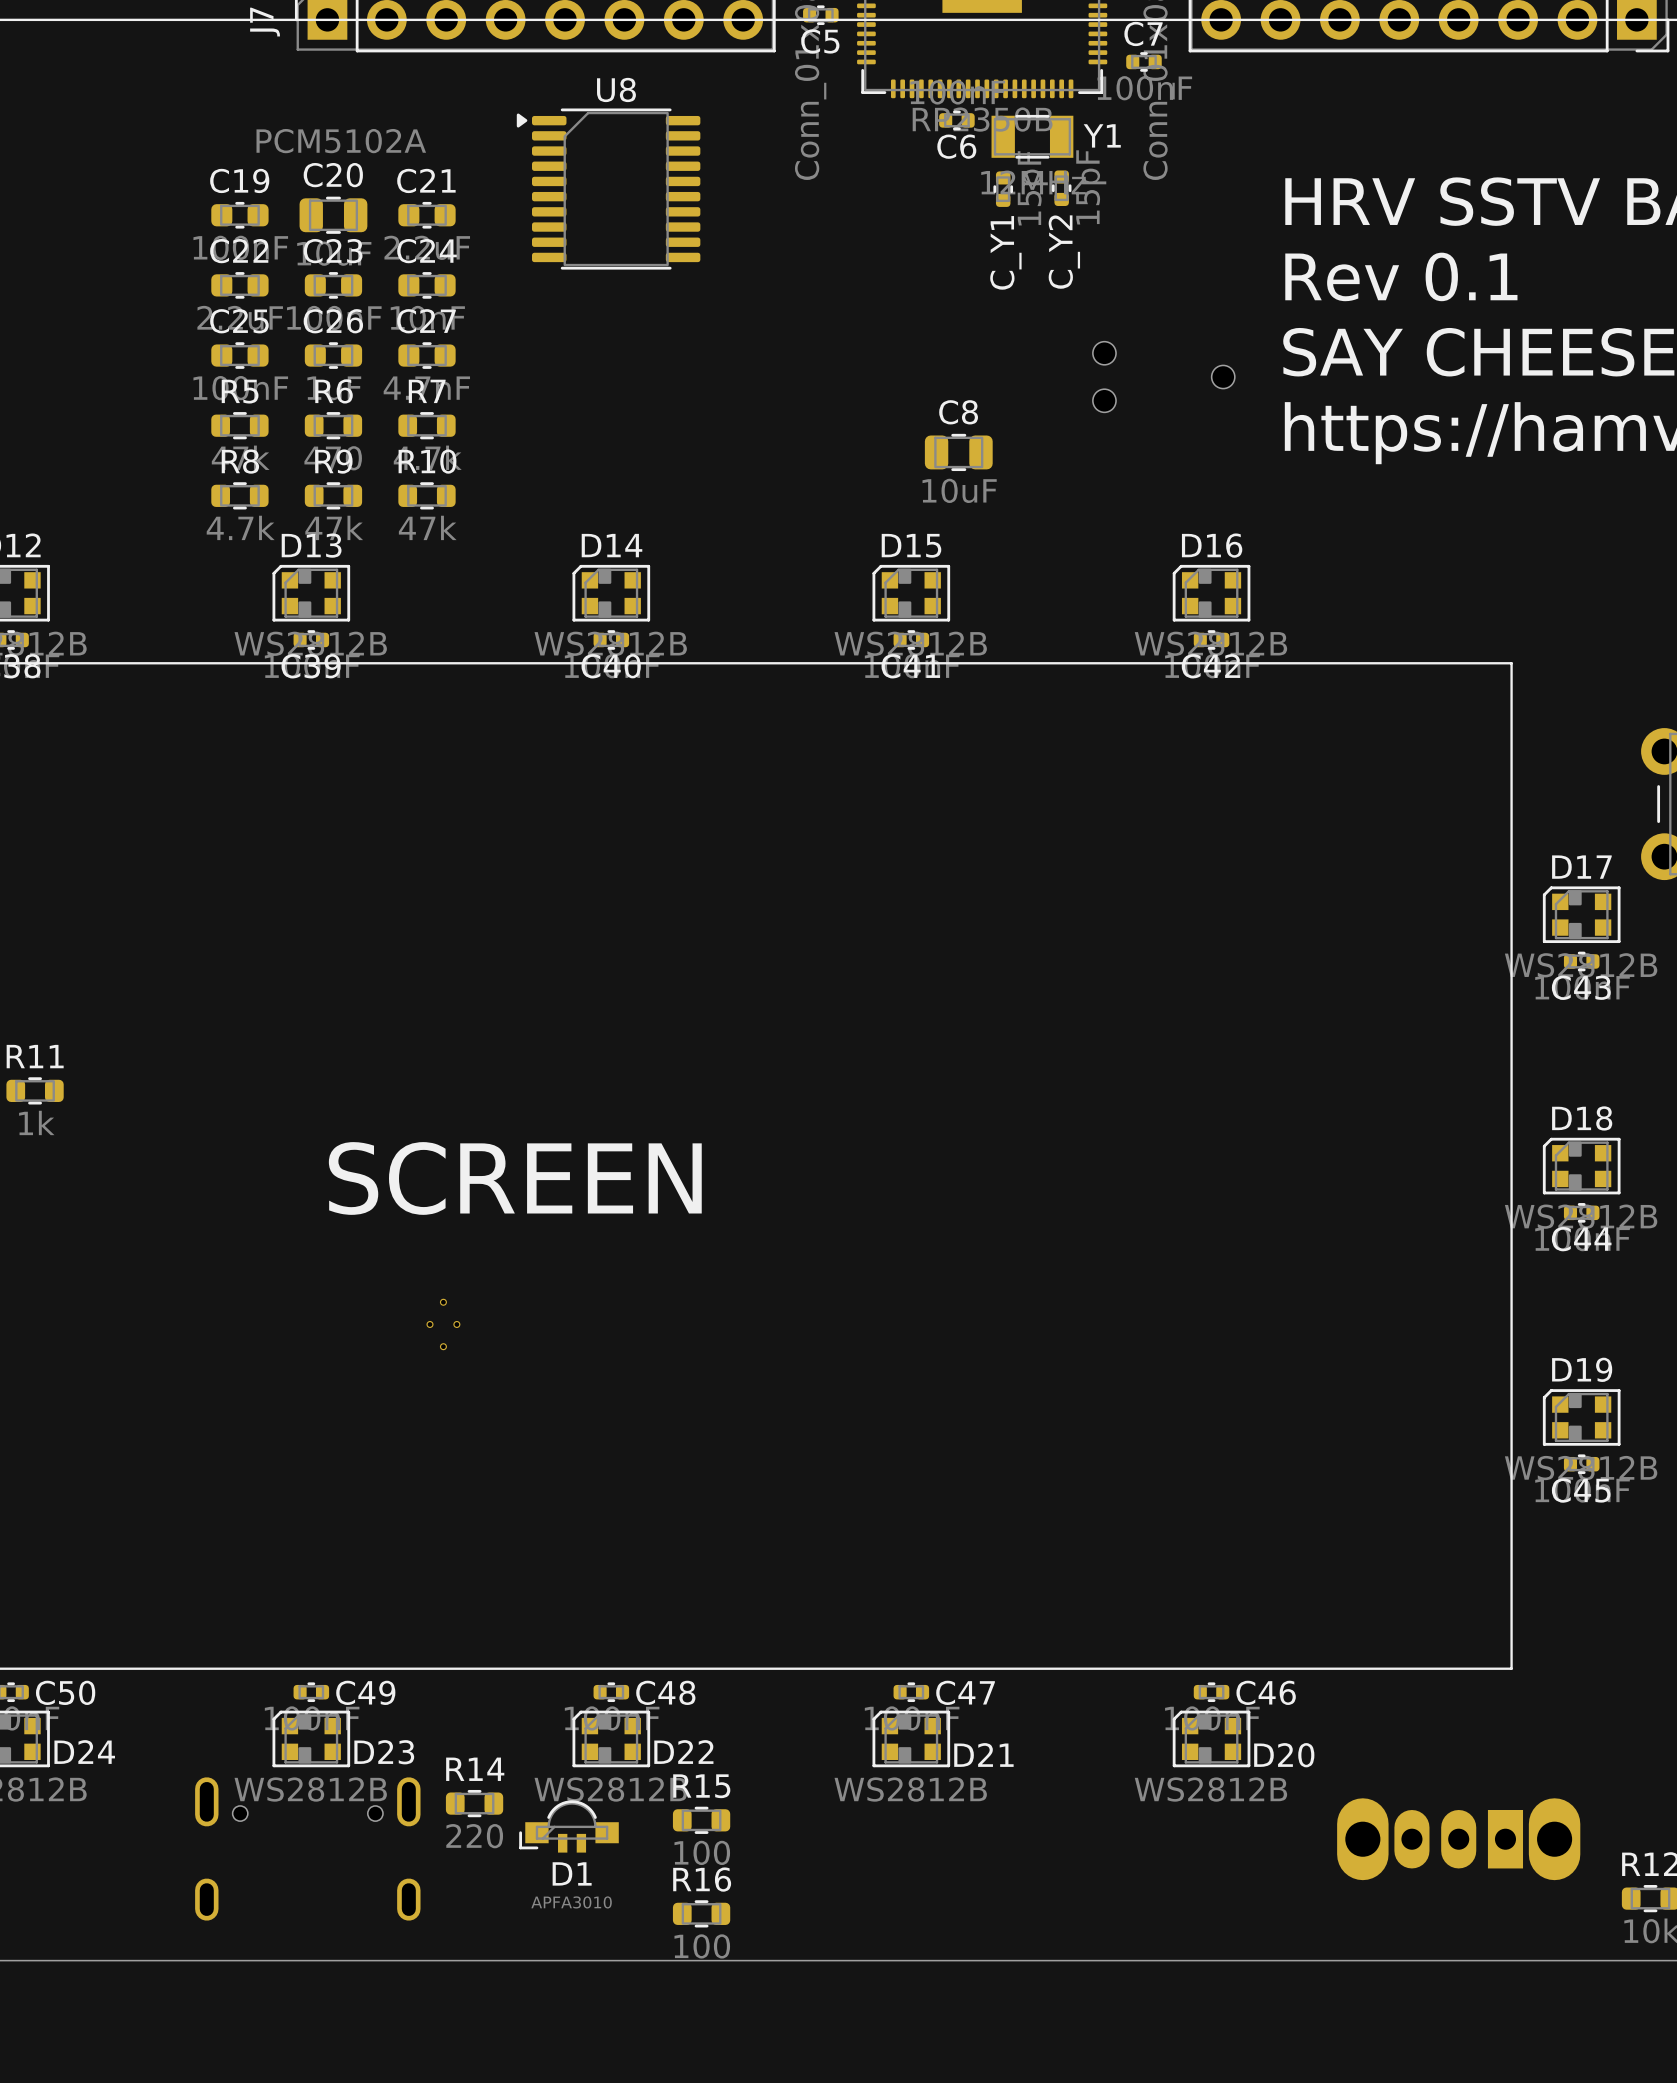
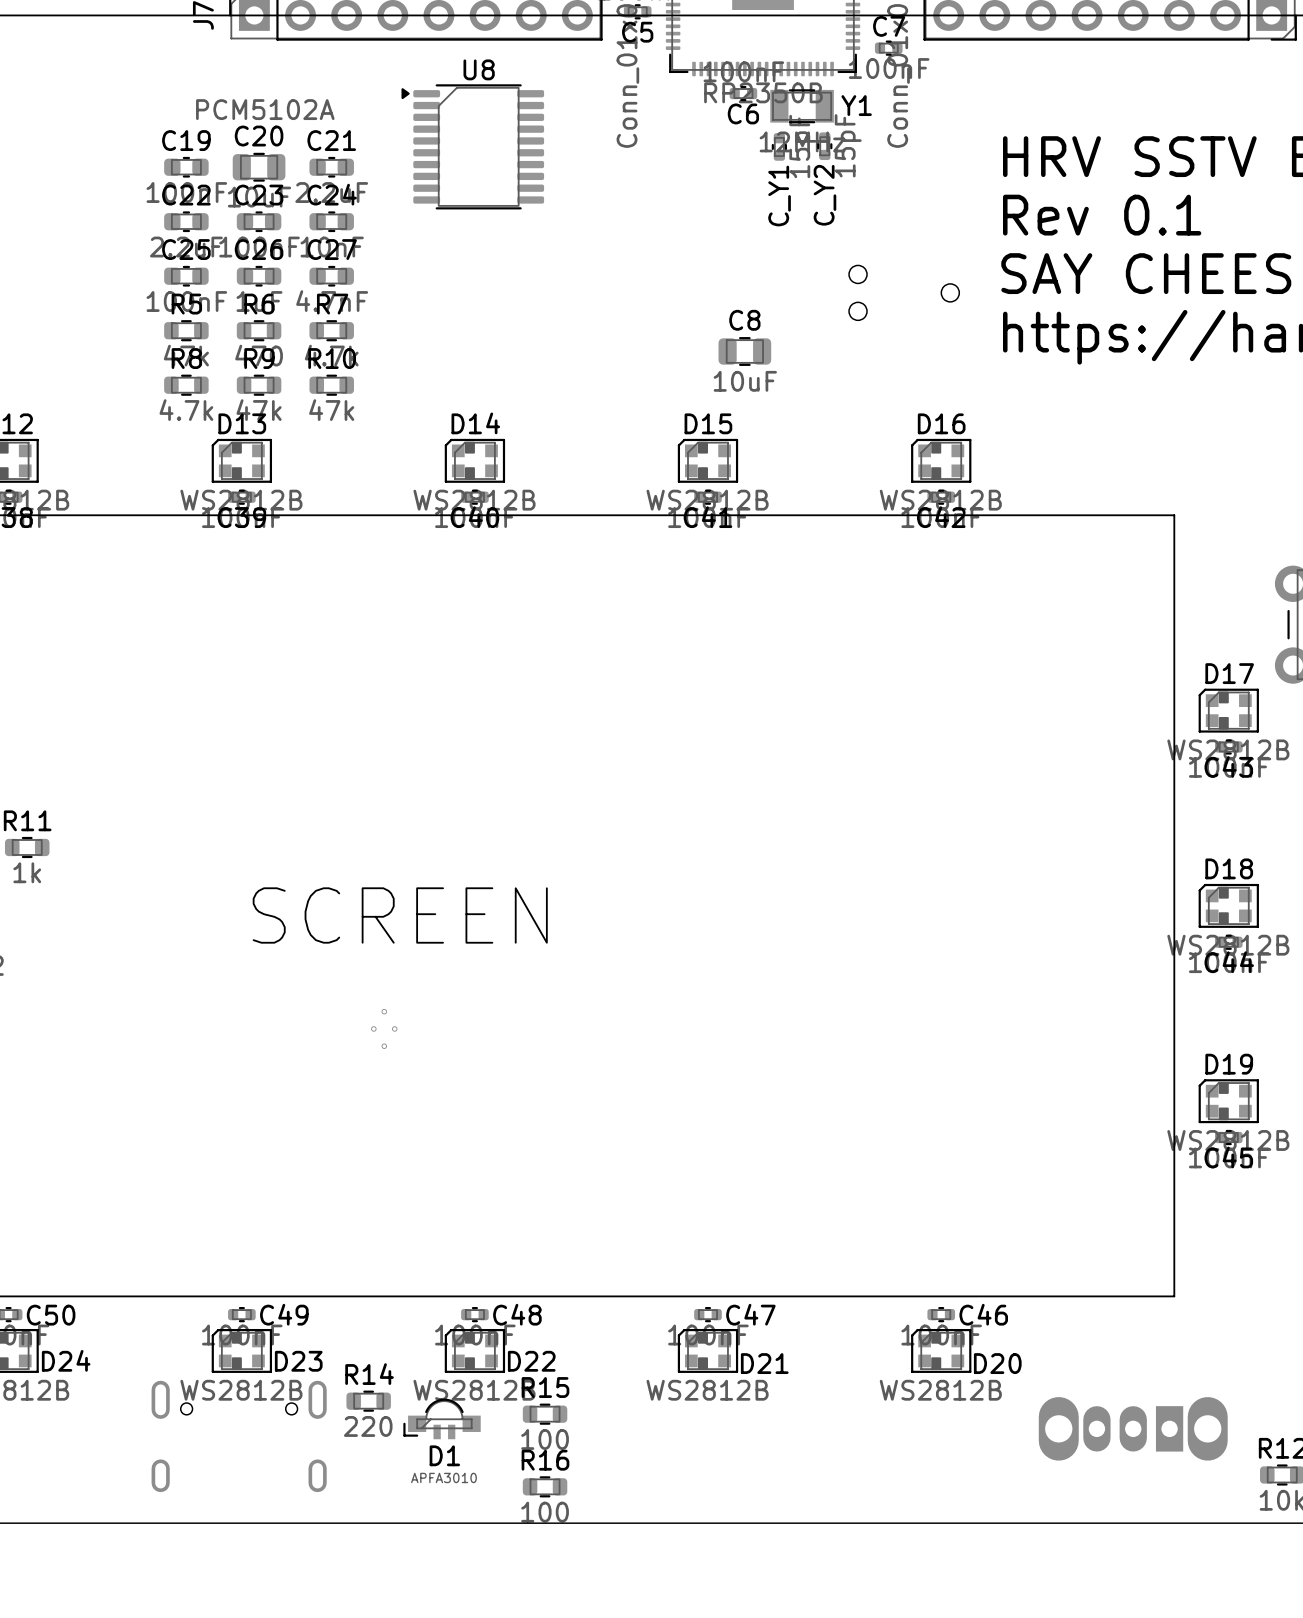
part position: (443, 1324) -> (384, 1028)

